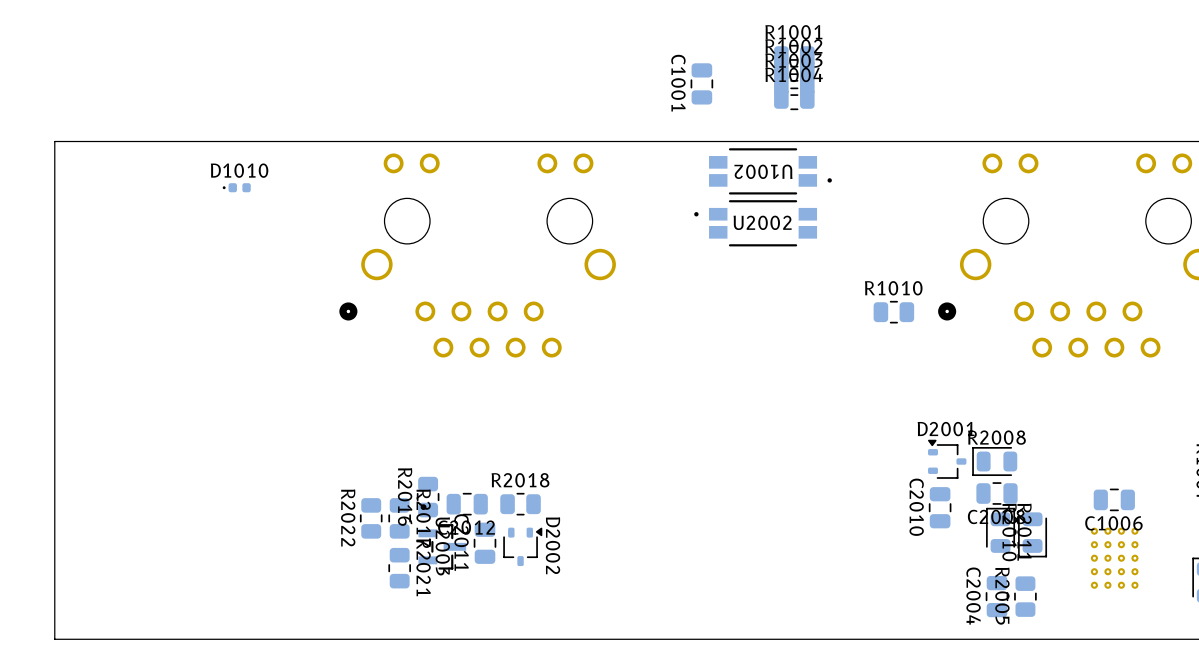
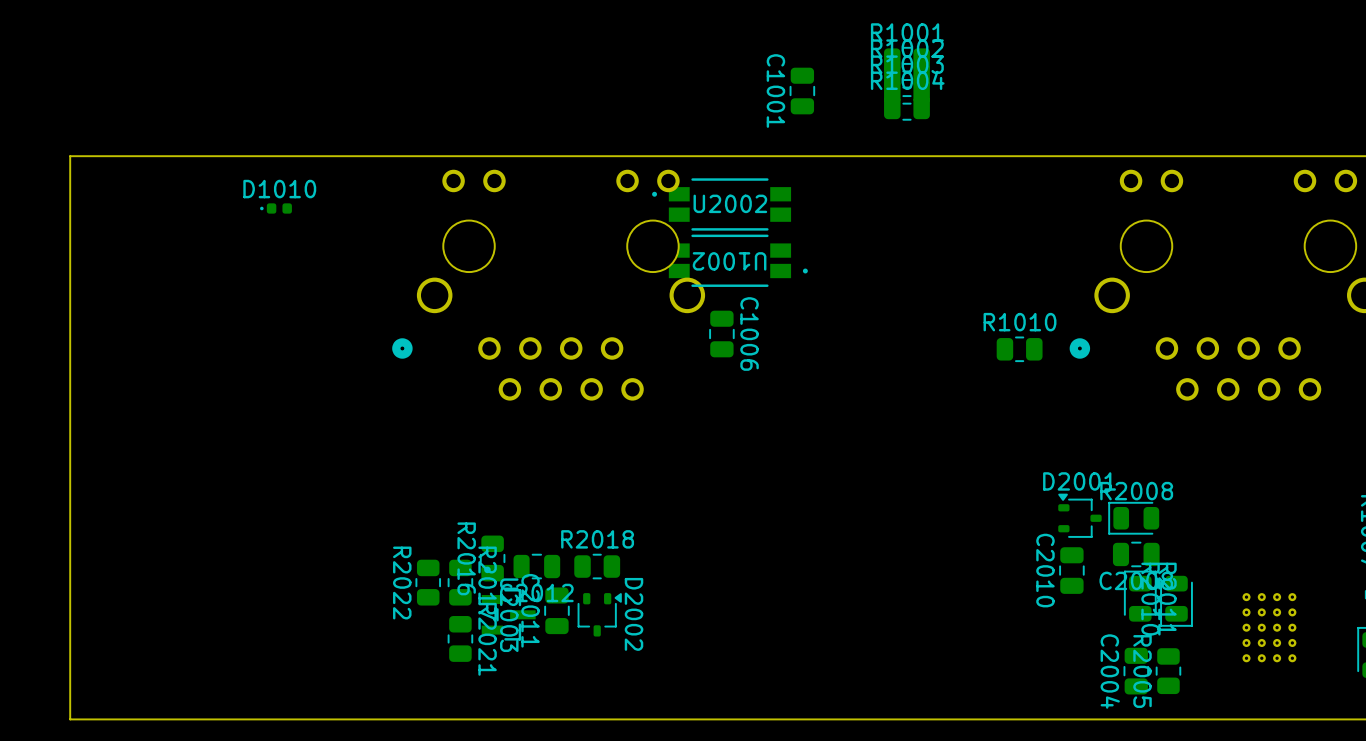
U1002 position: (770, 171) -> (738, 260)
U2002 position: (755, 223) -> (721, 204)
C1006 rotation: 0° (1114, 499) -> 90° clockwise (721, 334)
C1006 position: (1114, 499) -> (721, 334)
C1006 name position: C1006 (1113, 523) -> C1006 (749, 334)

